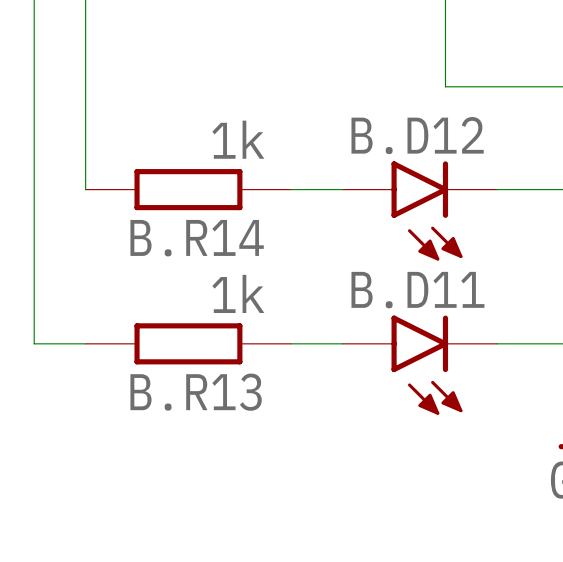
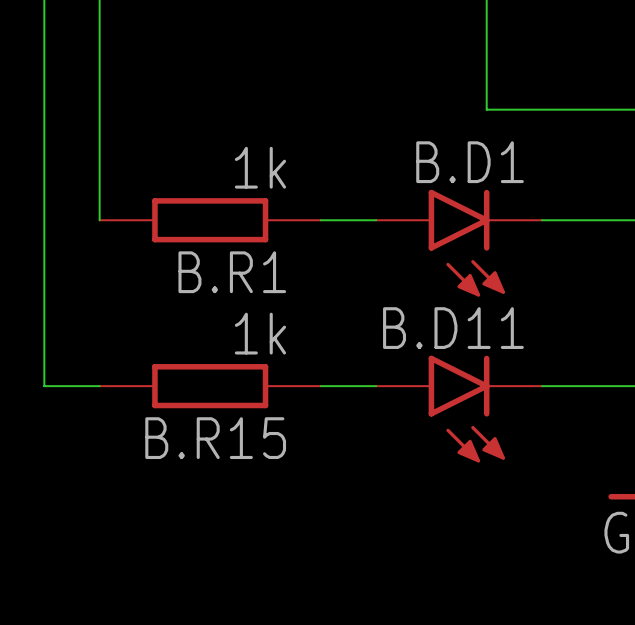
B.D12 name: B.D12 (417, 135) -> B.D1 (470, 162)
B.R14 name: B.R14 (197, 238) -> B.R1 (232, 272)
B.R13 name: B.R13 (196, 392) -> B.R15 (215, 438)

